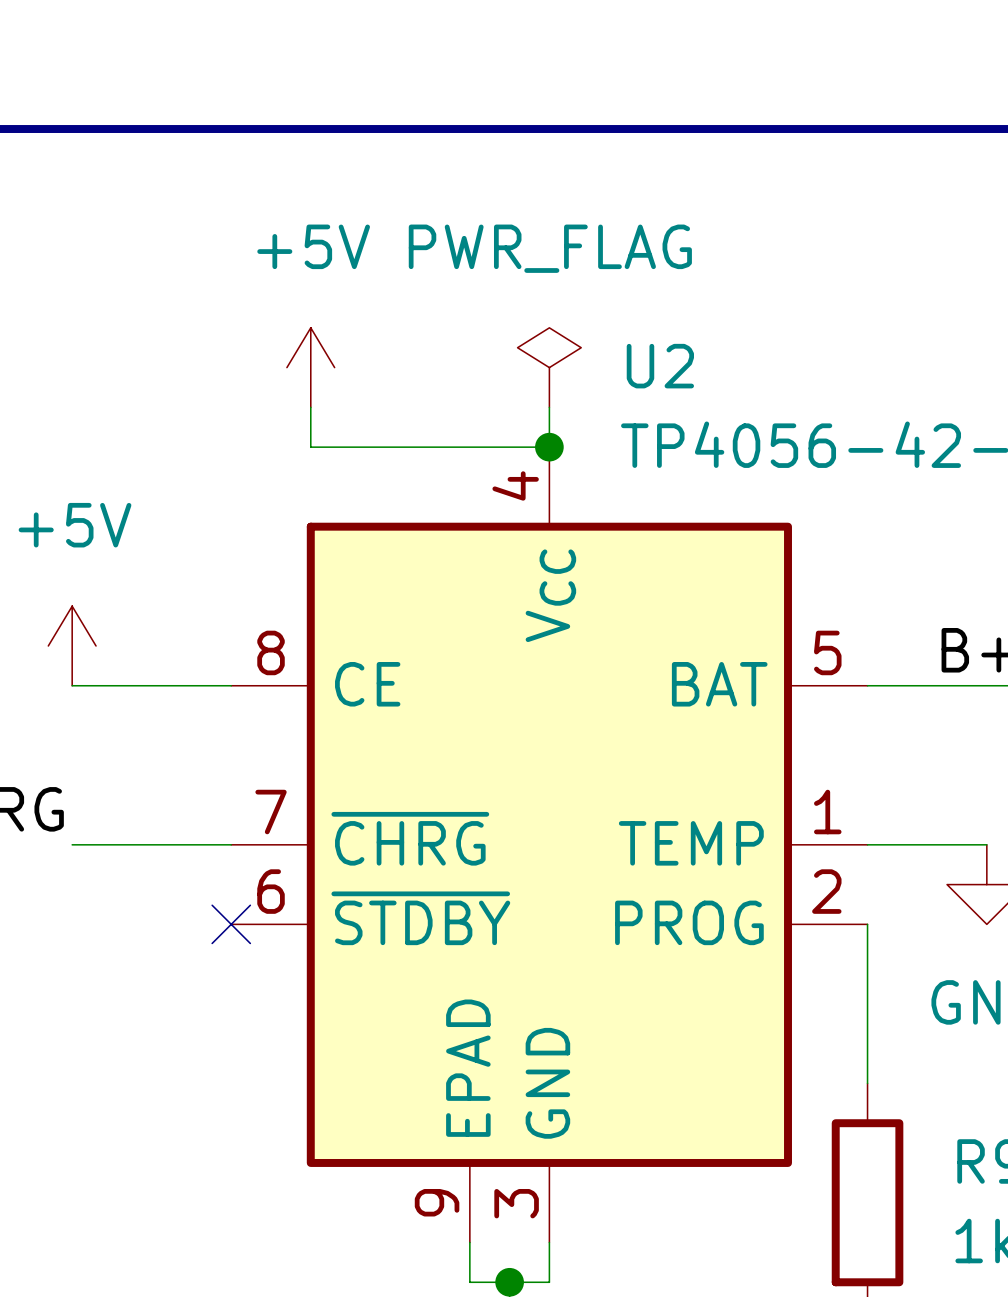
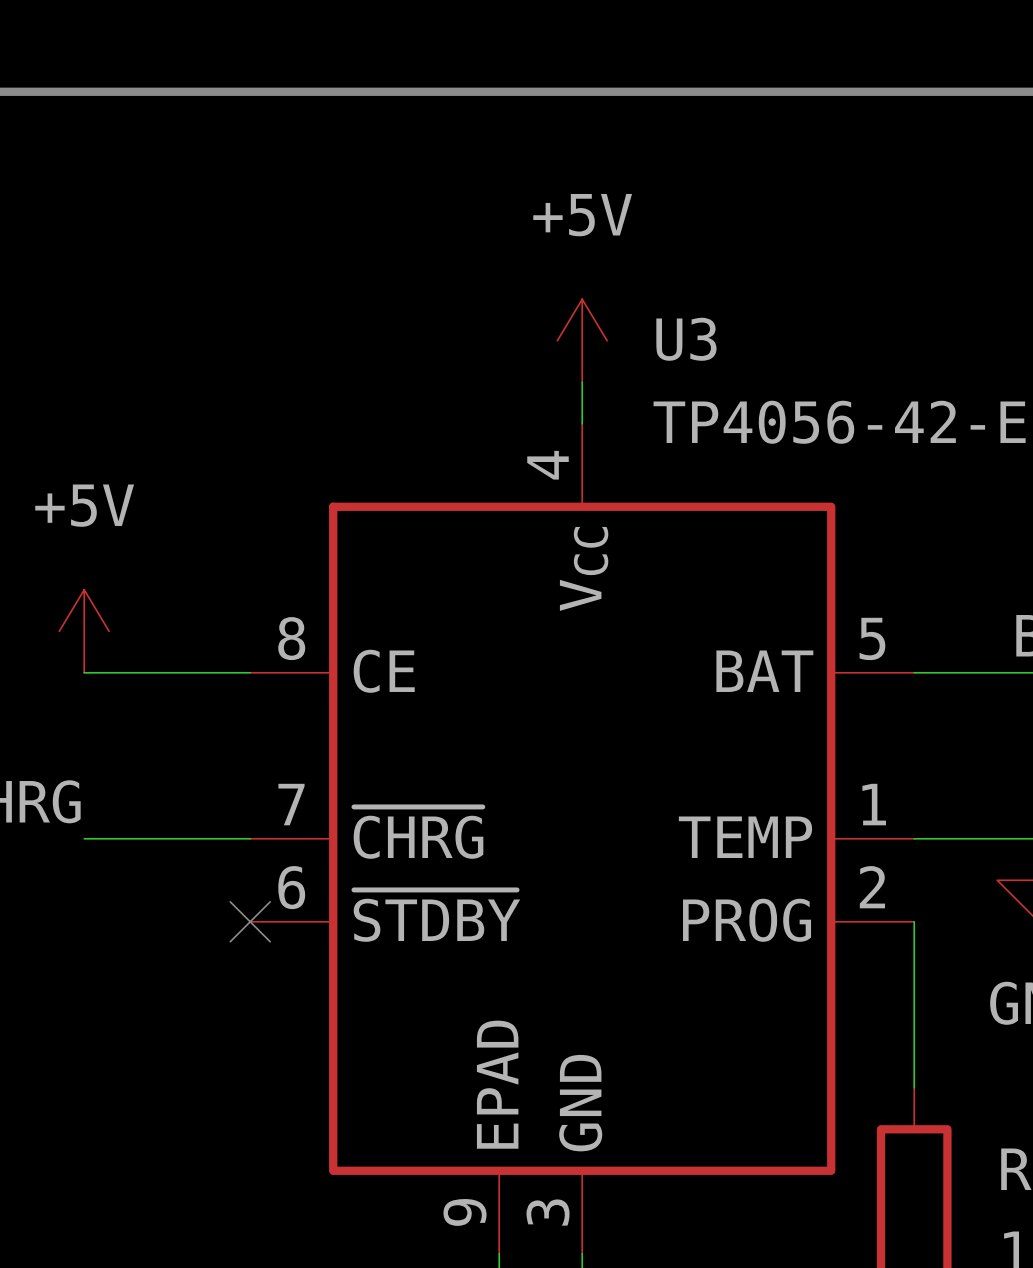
U2 name: U2 (660, 366) -> U3 (686, 339)
power symbol: +5V (310, 367) -> none
power symbol: PWR_FLAG (549, 367) -> +5V (582, 340)
wire: (310, 407) (310, 447) (549, 447) -> none
junction: (549, 447) -> none

